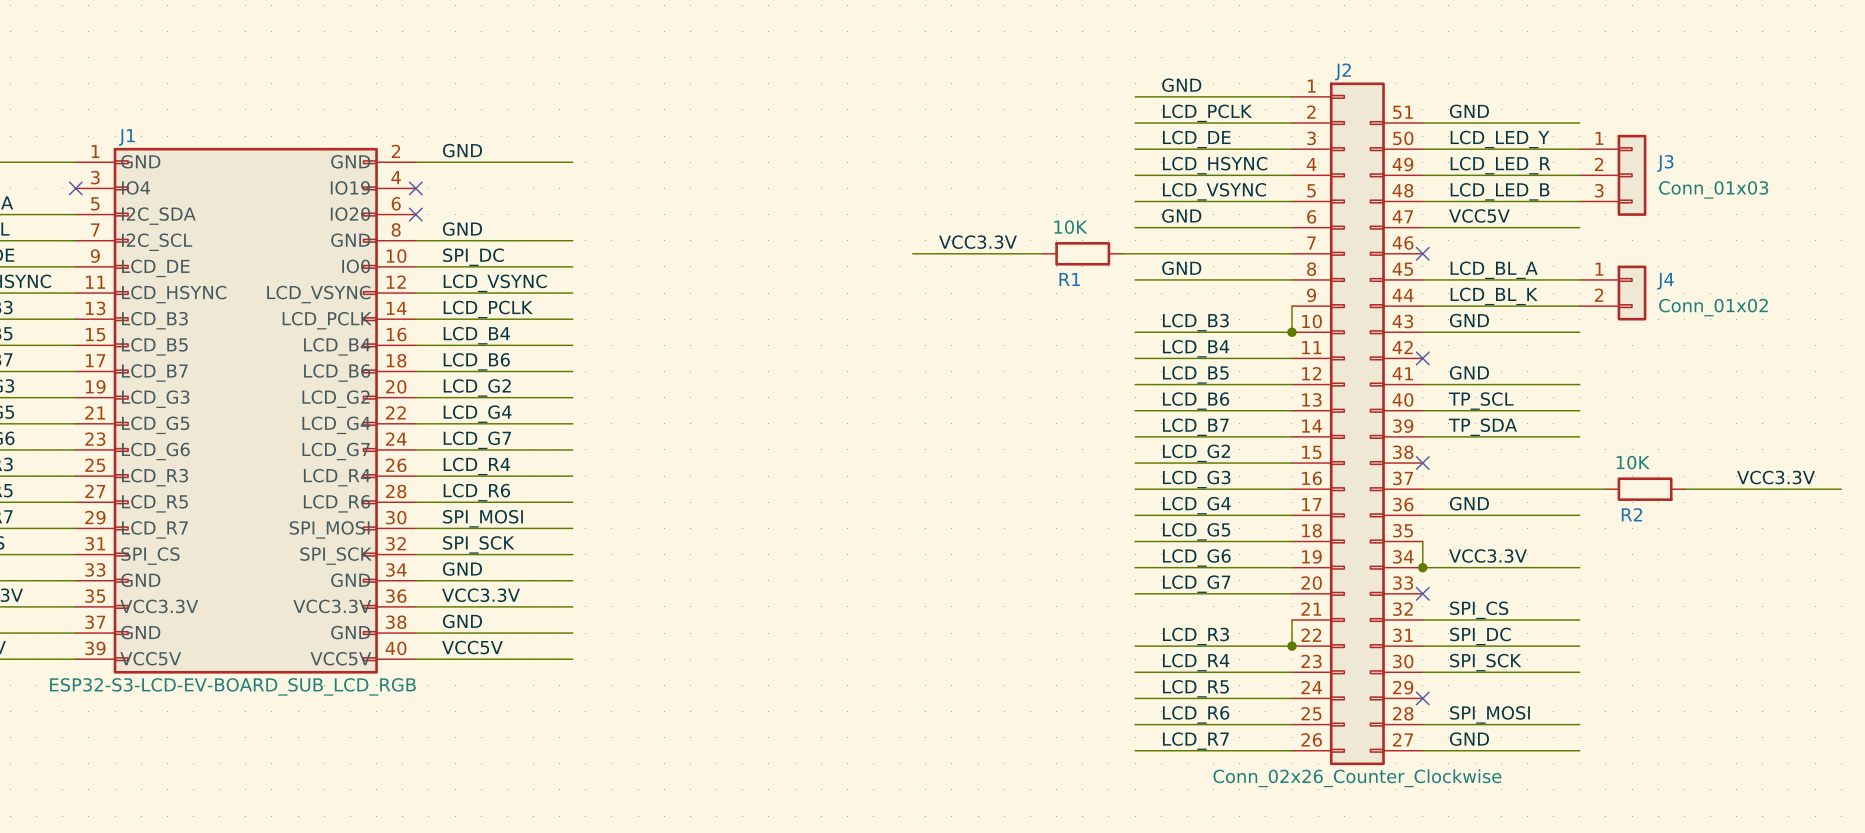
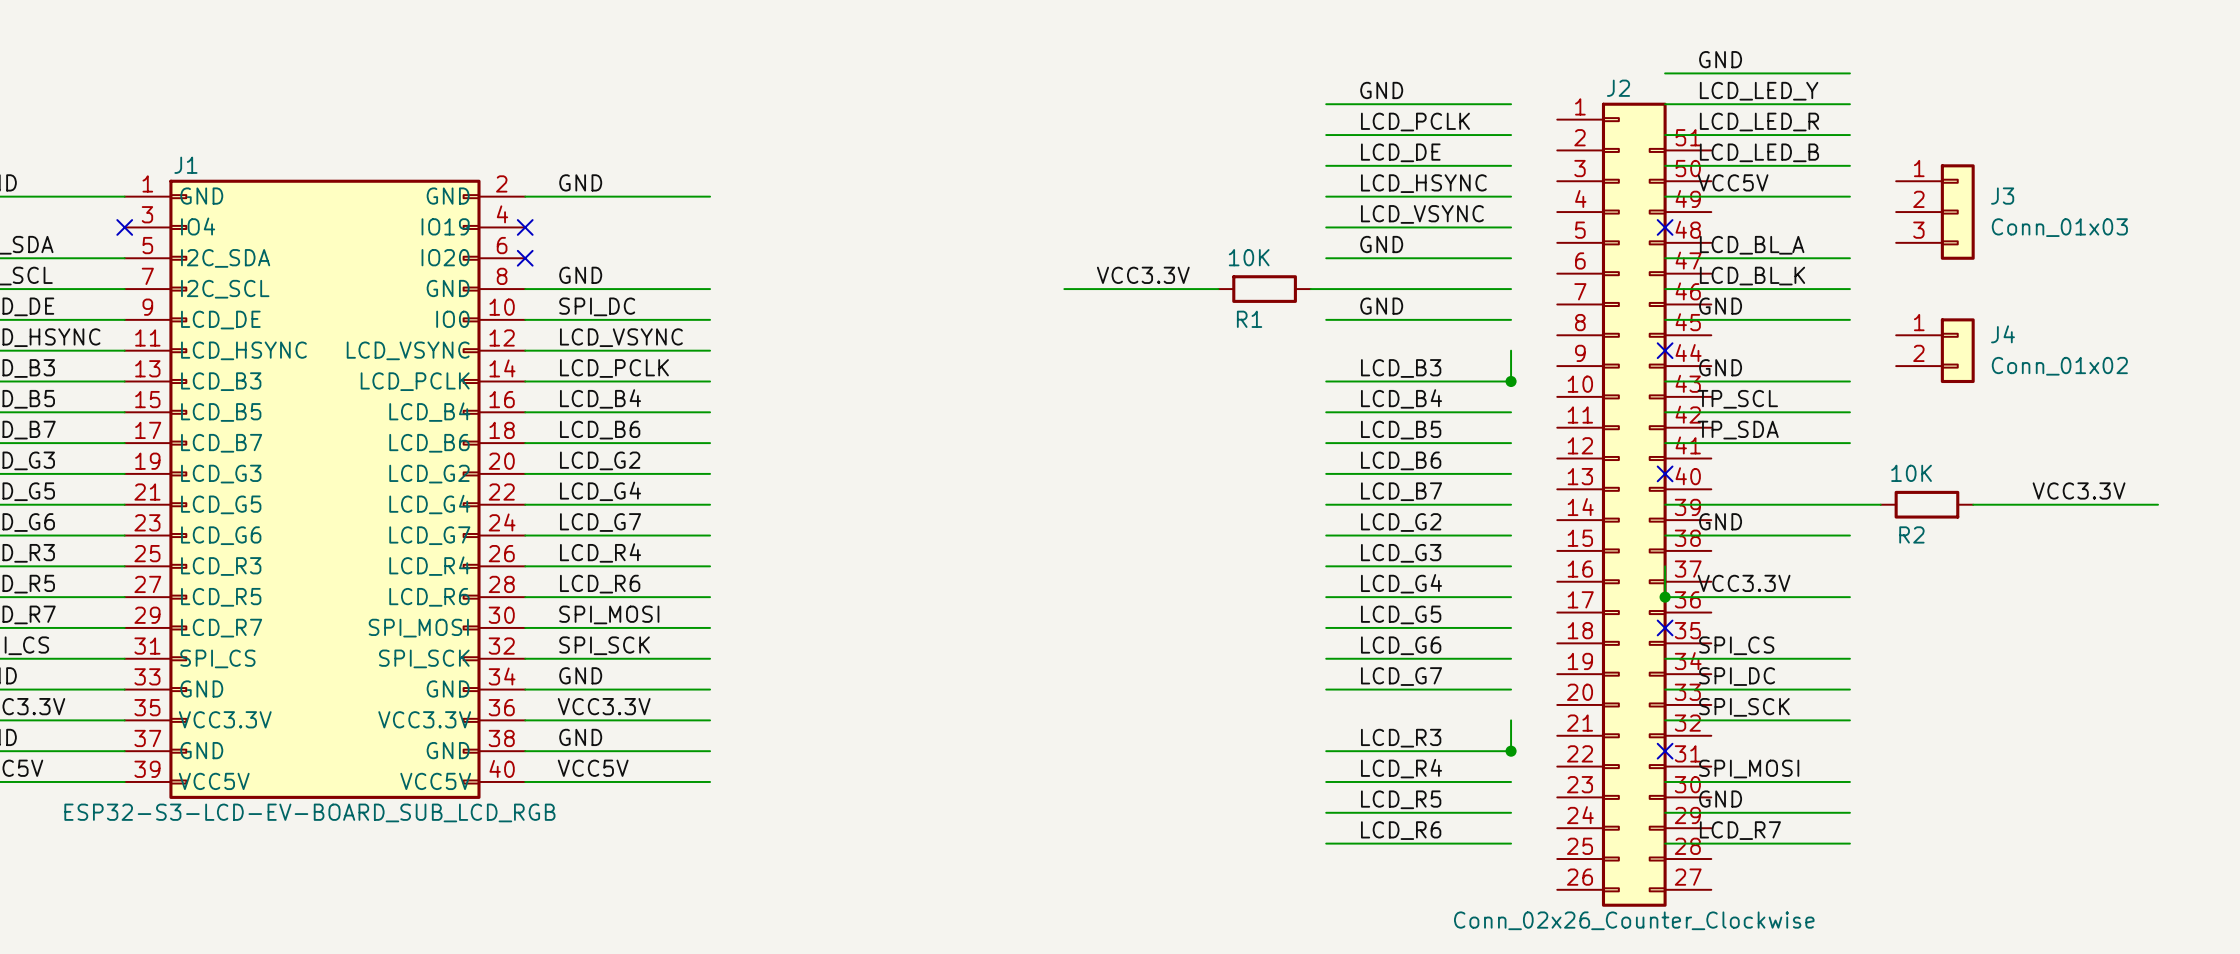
label: none -> GND (1720, 59)
label position: GND (1181, 85) -> GND (1381, 90)
wire: (1135, 96) (1291, 96) -> none
label: GND (1469, 111) -> none
label position: LCD_PCLK (1207, 113) -> LCD_PCLK (1415, 122)
wire: (1135, 123) (1291, 123) -> (1326, 227) (1511, 227)
wire: (1422, 123) (1579, 123) -> (1665, 73) (1849, 73)
label position: LCD_DE (1196, 139) -> LCD_DE (1400, 152)
label position: LCD_LED_Y (1500, 139) -> LCD_LED_Y (1759, 91)
wire: (1135, 149) (1291, 149) -> (1326, 104) (1511, 104)
wire: (1422, 149) (1579, 149) -> (1665, 104) (1849, 104)
label position: LCD_HSYNC (1215, 165) -> LCD_HSYNC (1423, 183)
label position: LCD_LED_R (1500, 165) -> LCD_LED_R (1759, 122)
wire: (1135, 175) (1291, 175) -> (1326, 135) (1511, 135)
wire: (1422, 175) (1579, 175) -> (1665, 135) (1849, 135)
no-connect mark: none -> (1665, 227)
label position: LCD_VSYNC (1214, 191) -> LCD_VSYNC (1422, 214)
label position: LCD_LED_B (1500, 191) -> LCD_LED_B (1759, 152)
wire: (1135, 201) (1291, 201) -> (1326, 165) (1511, 165)
wire: (1422, 201) (1579, 201) -> (1665, 165) (1849, 165)
label position: GND (1181, 215) -> GND (1381, 244)
label position: VCC5V (1479, 215) -> VCC5V (1733, 182)
wire: (1135, 227) (1291, 227) -> (1326, 196) (1511, 196)
wire: (1422, 227) (1579, 227) -> (1665, 196) (1849, 196)
label position: VCC3.3V (977, 242) -> VCC3.3V (1143, 275)
wire: (912, 253) (1043, 253) -> (1064, 289) (1218, 289)
R1 position: (1082, 253) -> (1264, 289)
wire: (1121, 253) (1291, 253) -> (1310, 289) (1511, 289)
no-connect mark: (1422, 253) -> none
label: none -> GND (1720, 306)
label position: GND (1181, 268) -> GND (1381, 306)
label position: LCD_BL_A (1494, 270) -> LCD_BL_A (1752, 245)
wire: (1135, 279) (1291, 279) -> (1326, 258) (1511, 258)
wire: (1422, 279) (1579, 279) -> (1665, 258) (1849, 258)
no-connect mark: none -> (1665, 350)
label position: LCD_BL_K (1494, 296) -> LCD_BL_K (1752, 276)
wire: (1291, 306) (1291, 332) (1135, 332) -> (1511, 350) (1511, 381) (1326, 381)
wire: (1422, 306) (1579, 306) -> (1665, 289) (1849, 289)
label position: GND (1469, 320) -> GND (1720, 367)
label position: LCD_B3 (1195, 322) -> LCD_B3 (1401, 368)
junction position: (1291, 332) -> (1511, 381)
wire: (1422, 332) (1579, 332) -> (1665, 319) (1849, 319)
label position: LCD_B4 (1196, 348) -> LCD_B4 (1401, 398)
wire: (1135, 358) (1291, 358) -> (1326, 319) (1511, 319)
no-connect mark: (1422, 358) -> none
label: GND (1469, 372) -> none
label position: LCD_B5 (1195, 374) -> LCD_B5 (1401, 430)
wire: (1135, 384) (1291, 384) -> (1326, 658) (1511, 658)
wire: (1422, 384) (1579, 384) -> (1665, 381) (1849, 381)
no-connect mark: none -> (1665, 473)
label position: LCD_B6 (1196, 401) -> LCD_B6 (1401, 460)
label position: TP_SCL (1481, 401) -> TP_SCL (1737, 399)
wire: (1135, 410) (1291, 410) -> (1326, 412) (1511, 412)
wire: (1422, 410) (1579, 410) -> (1665, 412) (1849, 412)
label position: LCD_B7 (1195, 427) -> LCD_B7 (1401, 491)
label position: TP_SDA (1482, 427) -> TP_SDA (1738, 430)
wire: (1135, 436) (1291, 436) -> (1326, 443) (1511, 443)
wire: (1422, 436) (1579, 436) -> (1665, 443) (1849, 443)
label: none -> GND (1720, 521)
label position: LCD_G2 (1196, 453) -> LCD_G2 (1401, 522)
wire: (1135, 463) (1291, 463) -> (1326, 473) (1511, 473)
no-connect mark: (1422, 463) -> none
label position: VCC3.3V (1776, 477) -> VCC3.3V (2079, 490)
label position: LCD_G3 (1196, 479) -> LCD_G3 (1401, 553)
wire: (1135, 489) (1291, 489) -> (1326, 504) (1511, 504)
wire: (1422, 489) (1605, 489) -> (1665, 504) (1880, 504)
R2 position: (1645, 489) -> (1926, 504)
wire: (1684, 489) (1841, 489) -> (1973, 504) (2158, 504)
junction: none -> (1665, 597)
label: GND (1469, 503) -> none
label position: LCD_G4 (1196, 505) -> LCD_G4 (1401, 583)
wire: (1135, 515) (1291, 515) -> (1326, 535) (1511, 535)
wire: (1422, 515) (1579, 515) -> (1665, 535) (1849, 535)
no-connect mark: none -> (1665, 627)
label position: LCD_G5 (1196, 531) -> LCD_G5 (1401, 614)
wire: (1135, 541) (1291, 541) -> (1326, 566) (1511, 566)
wire: (1422, 541) (1422, 567) (1579, 567) -> (1665, 566) (1665, 597) (1849, 597)
label position: VCC3.3V (1487, 556) -> VCC3.3V (1744, 583)
label position: LCD_G6 (1196, 557) -> LCD_G6 (1401, 645)
wire: (1135, 567) (1291, 567) -> (1326, 597) (1511, 597)
junction: (1422, 567) -> none
label position: LCD_G7 (1196, 584) -> LCD_G7 (1401, 676)
wire: (1135, 593) (1291, 593) -> (1326, 627) (1511, 627)
no-connect mark: (1422, 593) -> none
label position: SPI_CS (1479, 610) -> SPI_CS (1736, 645)
wire: (1291, 619) (1291, 646) (1135, 646) -> (1511, 720) (1511, 751) (1326, 751)
wire: (1422, 619) (1579, 619) -> (1665, 658) (1849, 658)
no-connect mark: none -> (1665, 751)
label position: LCD_R3 (1195, 636) -> LCD_R3 (1401, 738)
label position: SPI_DC (1480, 636) -> SPI_DC (1737, 676)
junction position: (1291, 646) -> (1511, 751)
wire: (1422, 646) (1579, 646) -> (1665, 689) (1849, 689)
label position: LCD_R4 (1196, 662) -> LCD_R4 (1401, 768)
label position: SPI_SCK (1485, 662) -> SPI_SCK (1744, 707)
wire: (1135, 672) (1291, 672) -> (1326, 843) (1511, 843)
wire: (1422, 672) (1579, 672) -> (1665, 720) (1849, 720)
label position: LCD_R5 (1195, 688) -> LCD_R5 (1401, 799)
wire: (1135, 698) (1291, 698) -> (1326, 689) (1511, 689)
no-connect mark: (1422, 698) -> none
wire: none -> (1665, 843) (1849, 843)
label position: LCD_R6 (1196, 714) -> LCD_R6 (1401, 830)
label position: SPI_MOSI (1489, 714) -> SPI_MOSI (1749, 768)
wire: (1135, 724) (1291, 724) -> (1326, 781) (1511, 781)
wire: (1422, 724) (1579, 724) -> (1665, 781) (1849, 781)
label position: GND (1469, 739) -> GND (1720, 799)
label position: LCD_R7 (1195, 741) -> LCD_R7 (1740, 830)
wire: (1135, 750) (1291, 750) -> (1326, 812) (1511, 812)
wire: (1422, 750) (1579, 750) -> (1665, 812) (1849, 812)

